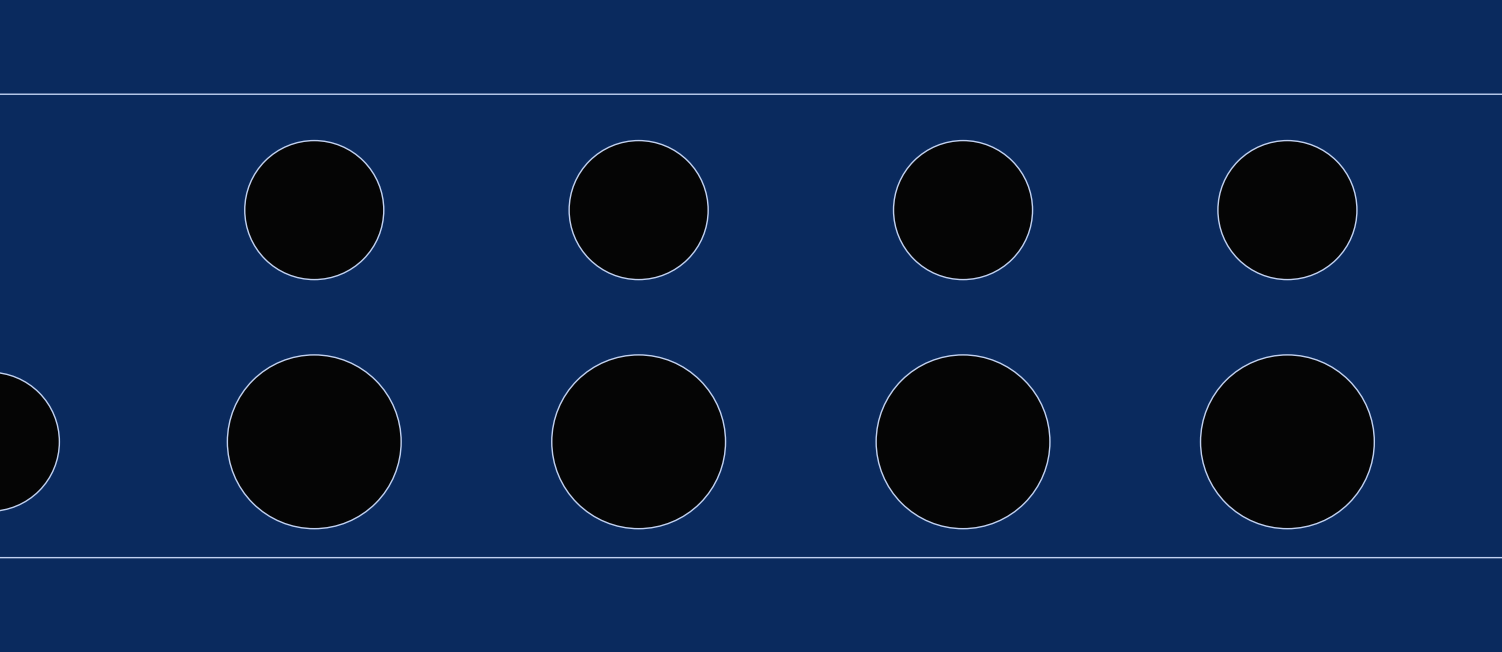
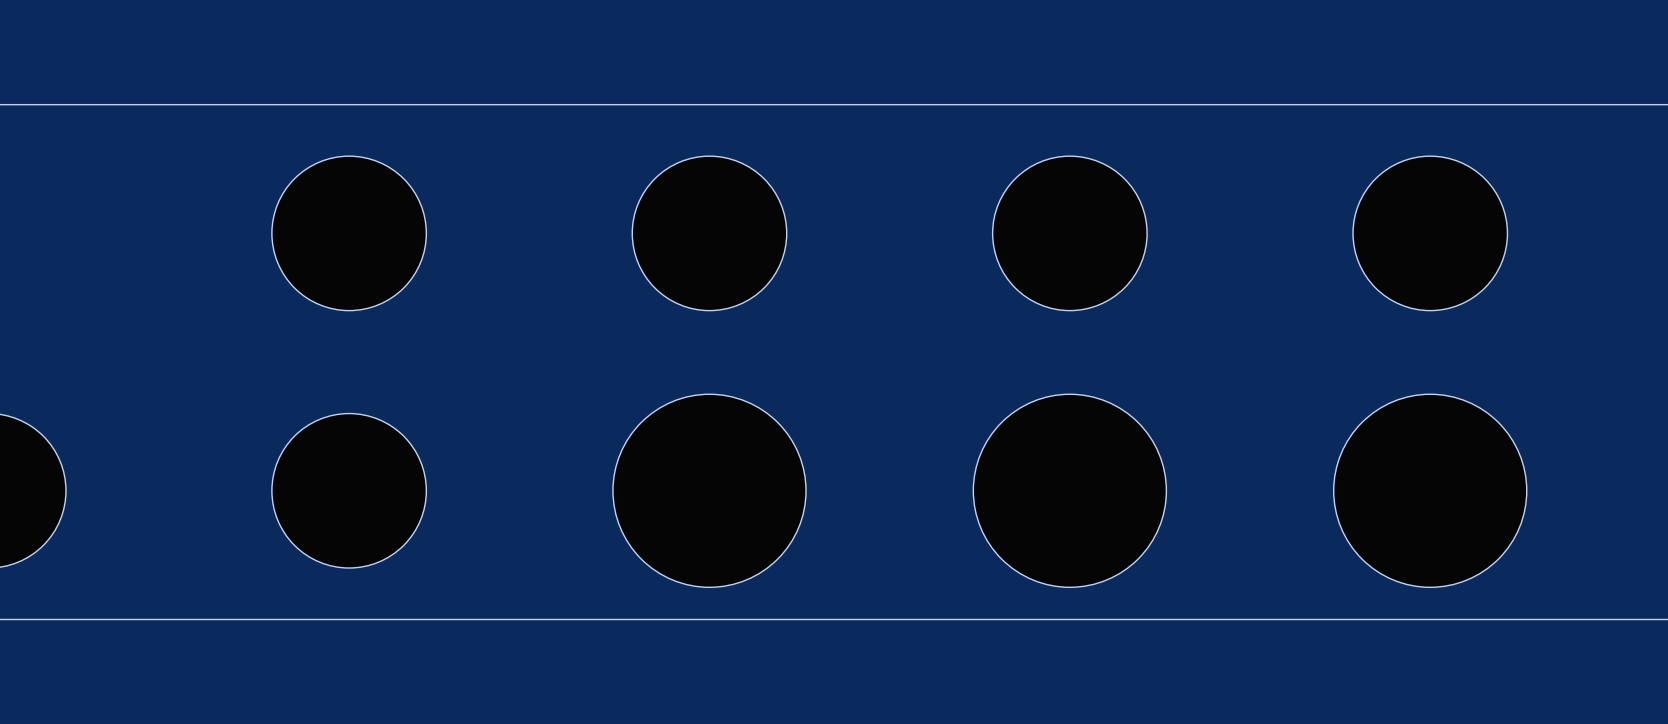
hole size: [227, 354, 402, 529] -> [271, 413, 427, 569]

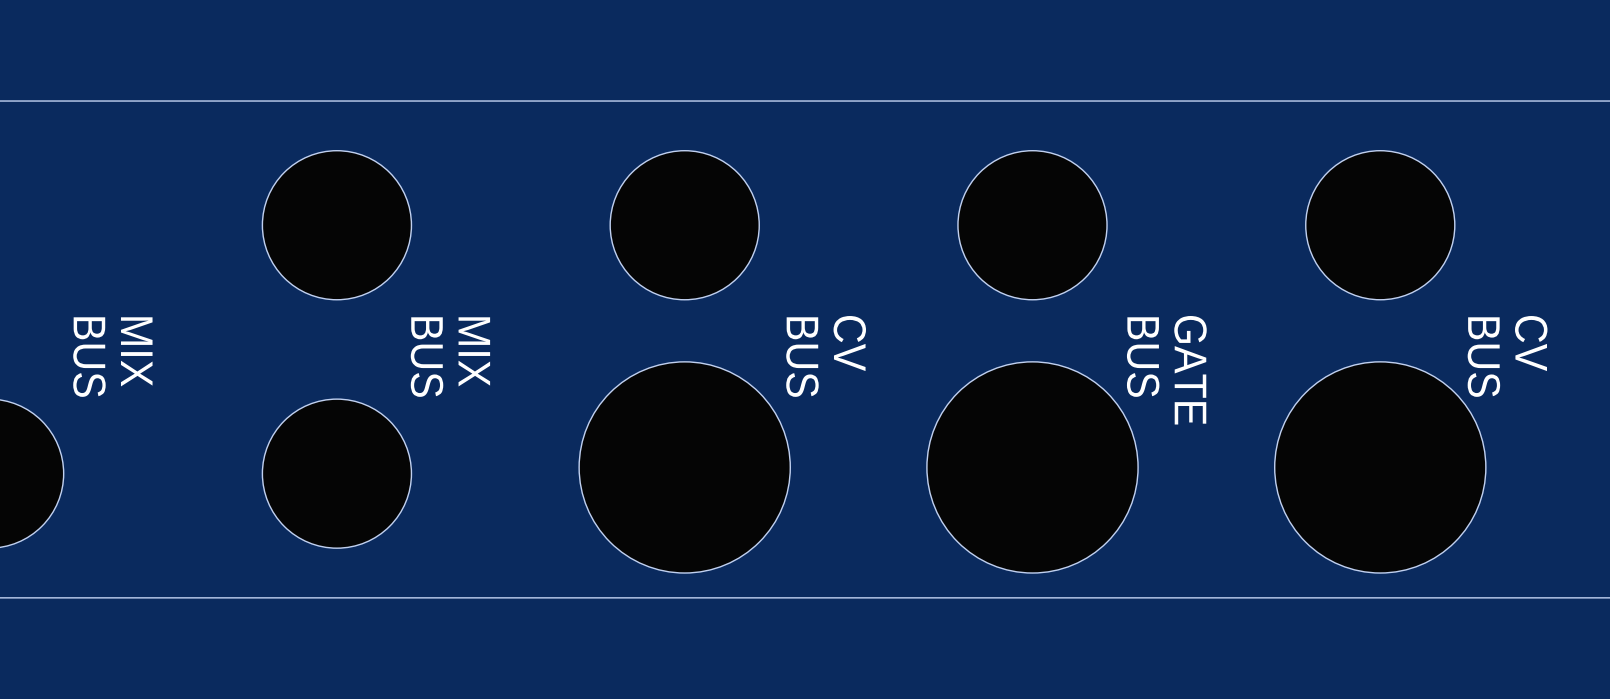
text: none -> CV (849, 343)
text: none -> CV (1531, 343)
text: none -> MIX (136, 351)
text: none -> MIX (474, 351)
text: none -> BUS (89, 357)
text: none -> BUS (427, 357)
text: none -> BUS (802, 357)
text: none -> BUS (1143, 357)
text: none -> BUS (1483, 357)
text: none -> GATE (1190, 370)
hole size: [612, 394, 807, 588] -> [579, 361, 791, 574]
hole size: [973, 394, 1167, 588] -> [926, 361, 1139, 574]
hole size: [1333, 394, 1527, 588] -> [1274, 361, 1486, 574]

